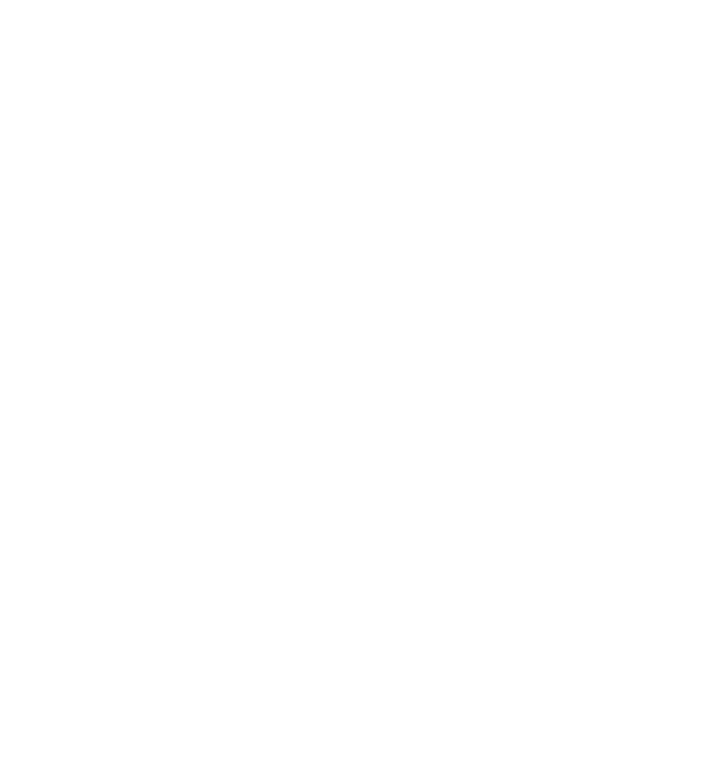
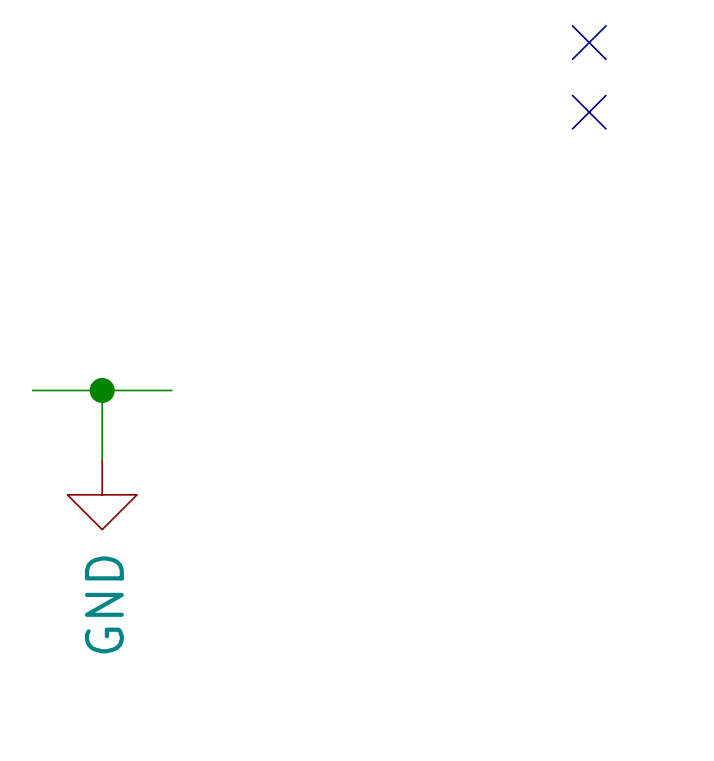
no-connect mark: none -> (589, 42)
no-connect mark: none -> (589, 112)
wire: none -> (32, 390) (171, 390)
wire: none -> (102, 390) (102, 460)
junction: none -> (102, 390)
power symbol: none -> GND (102, 494)

